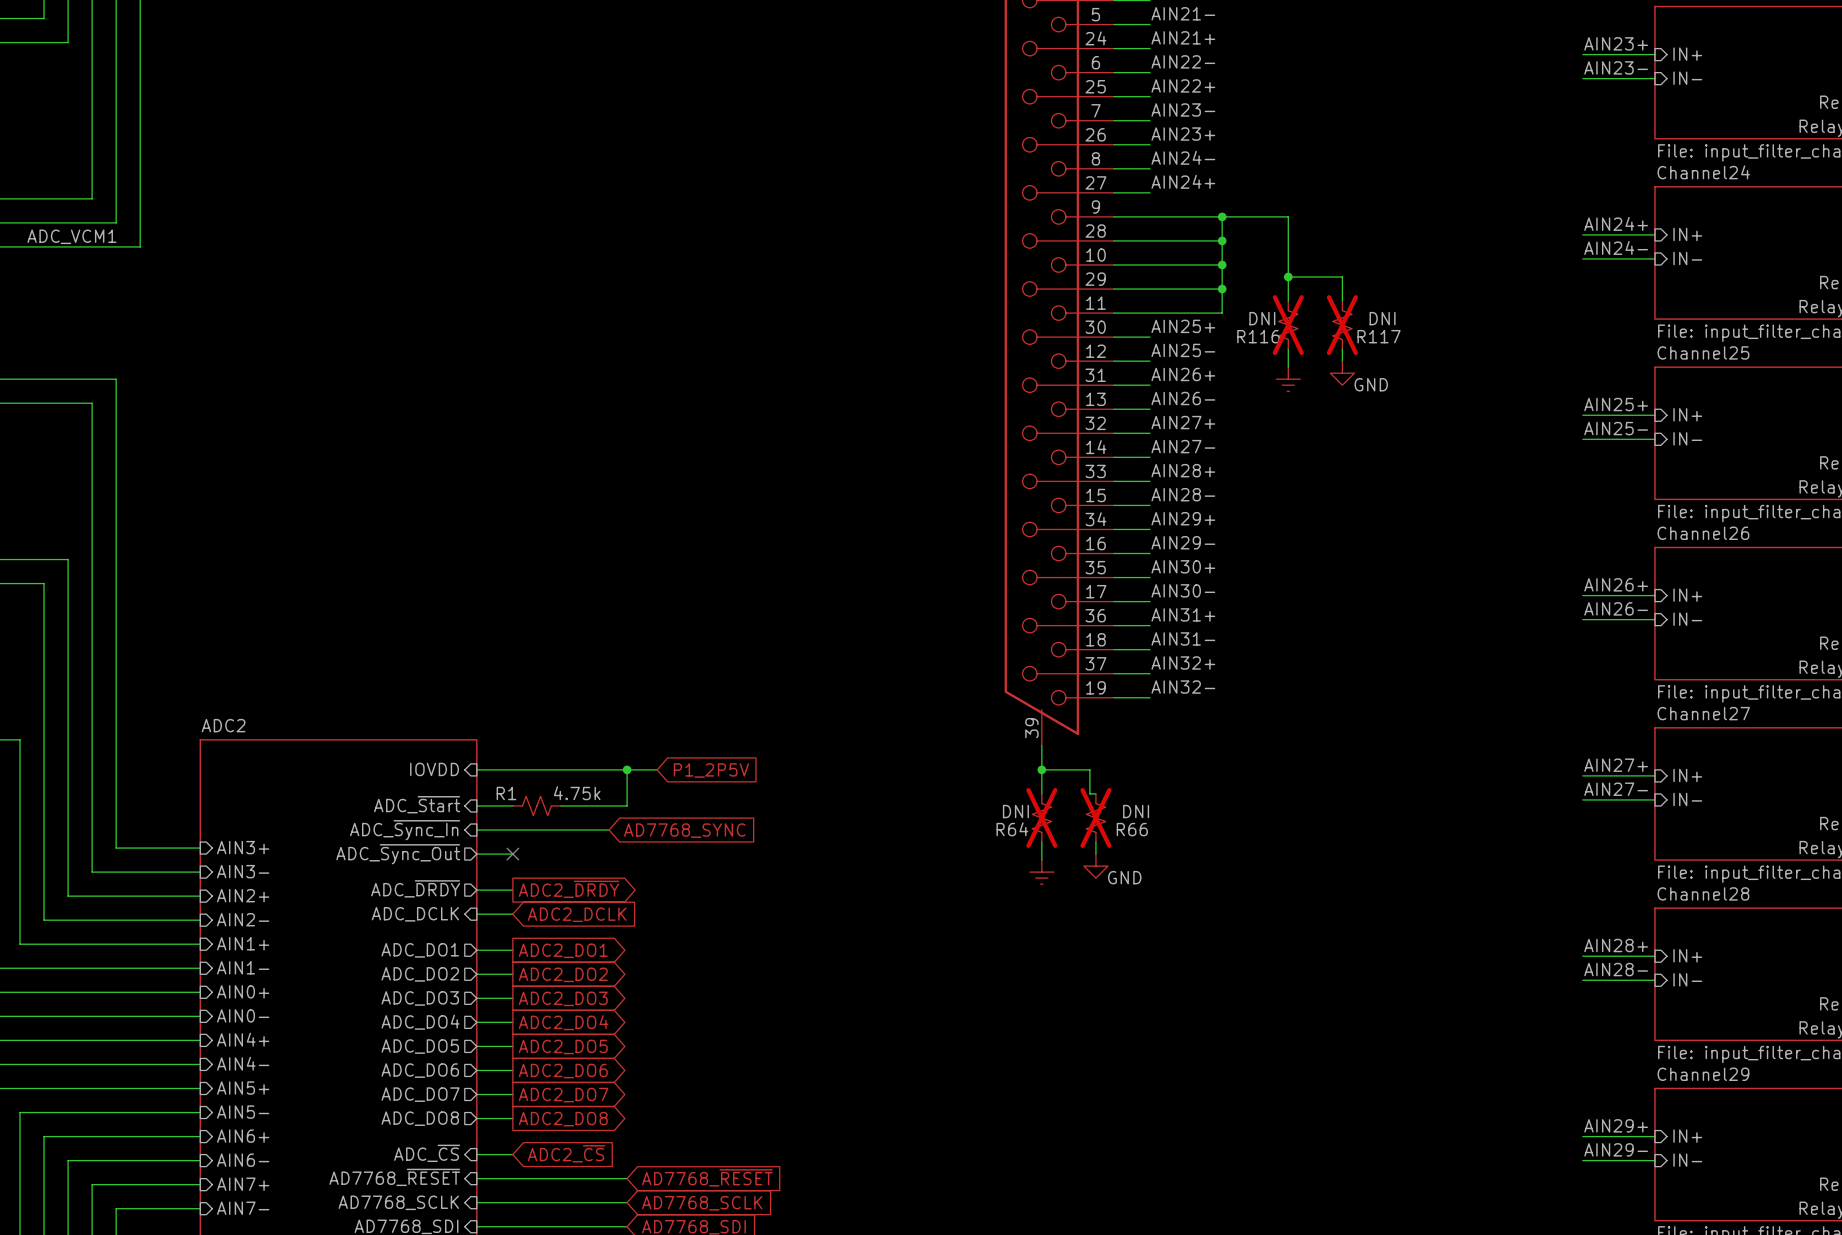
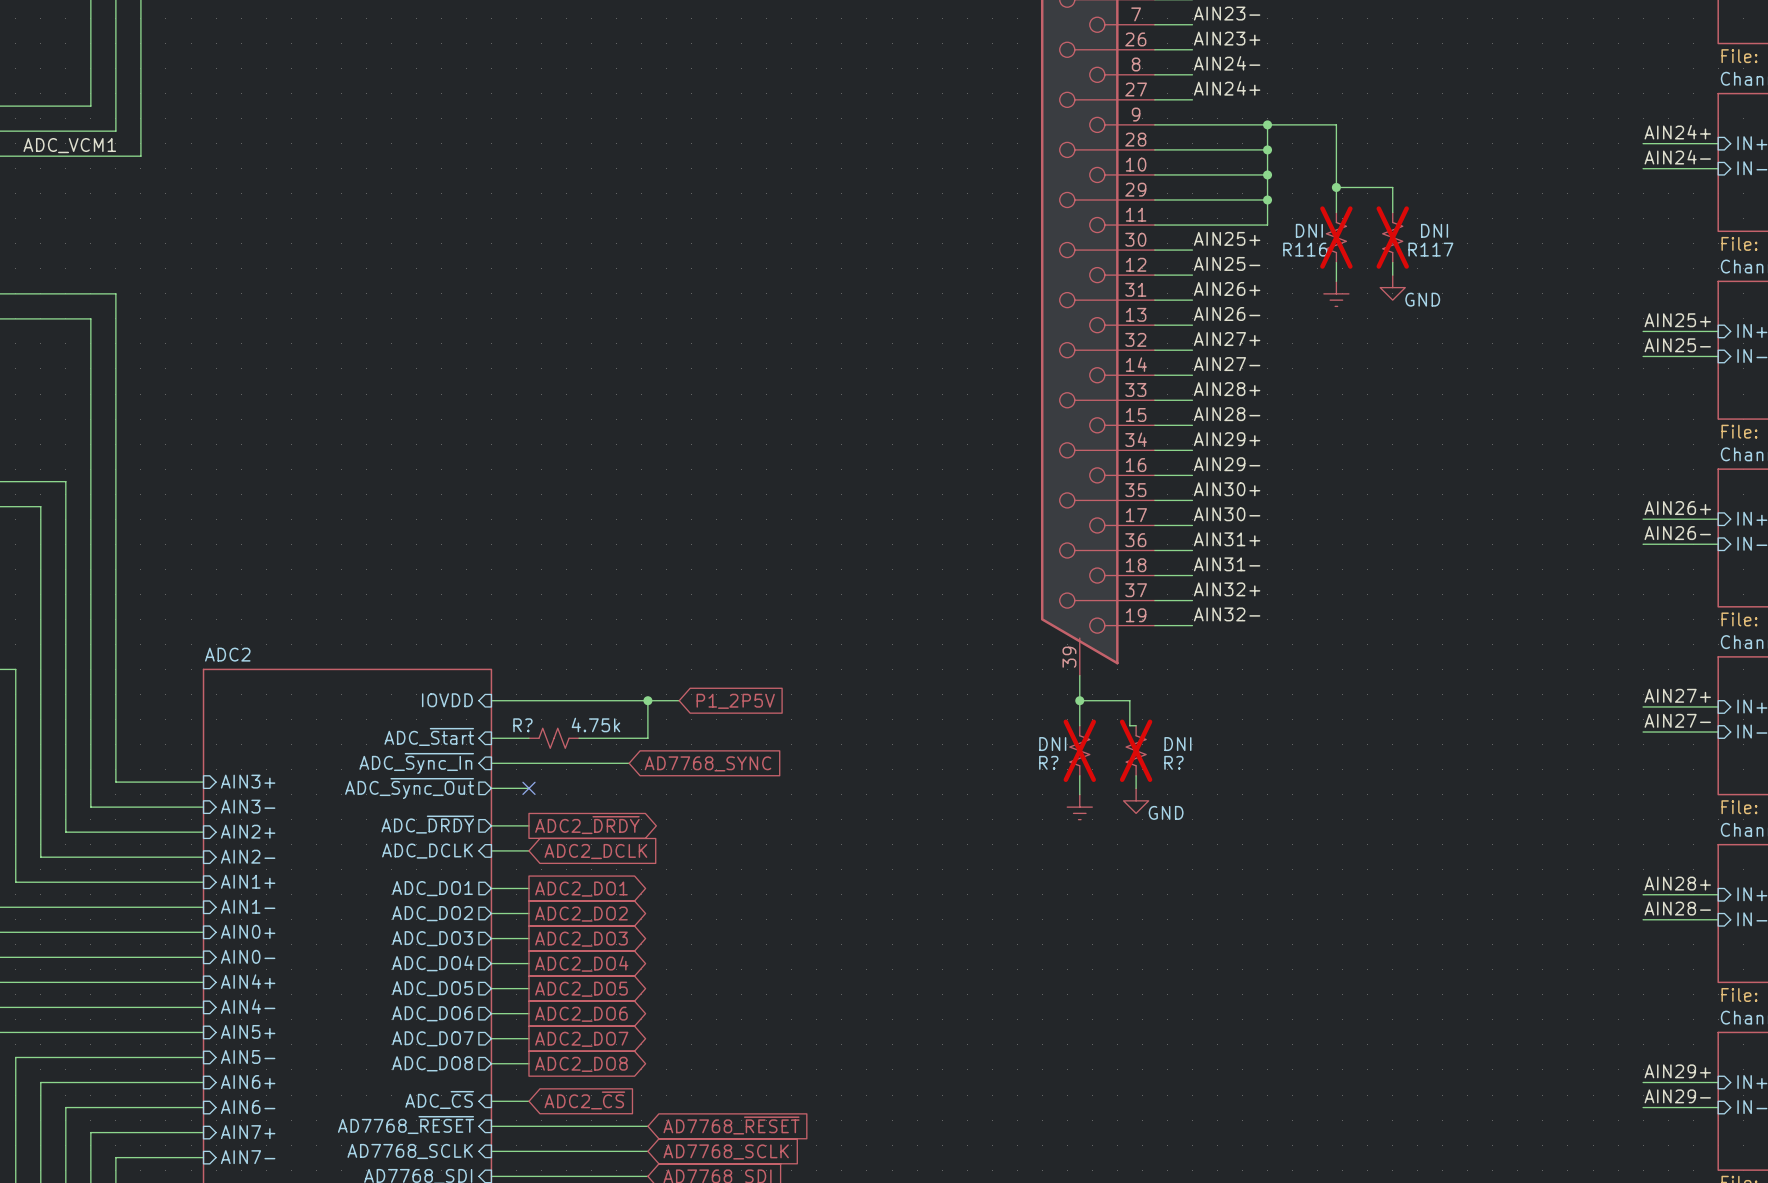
R1 name: R1 (506, 793) -> R? (522, 725)
R64 name: R64 (1012, 829) -> R? (1048, 762)
R66 name: R66 (1132, 829) -> R? (1173, 762)

